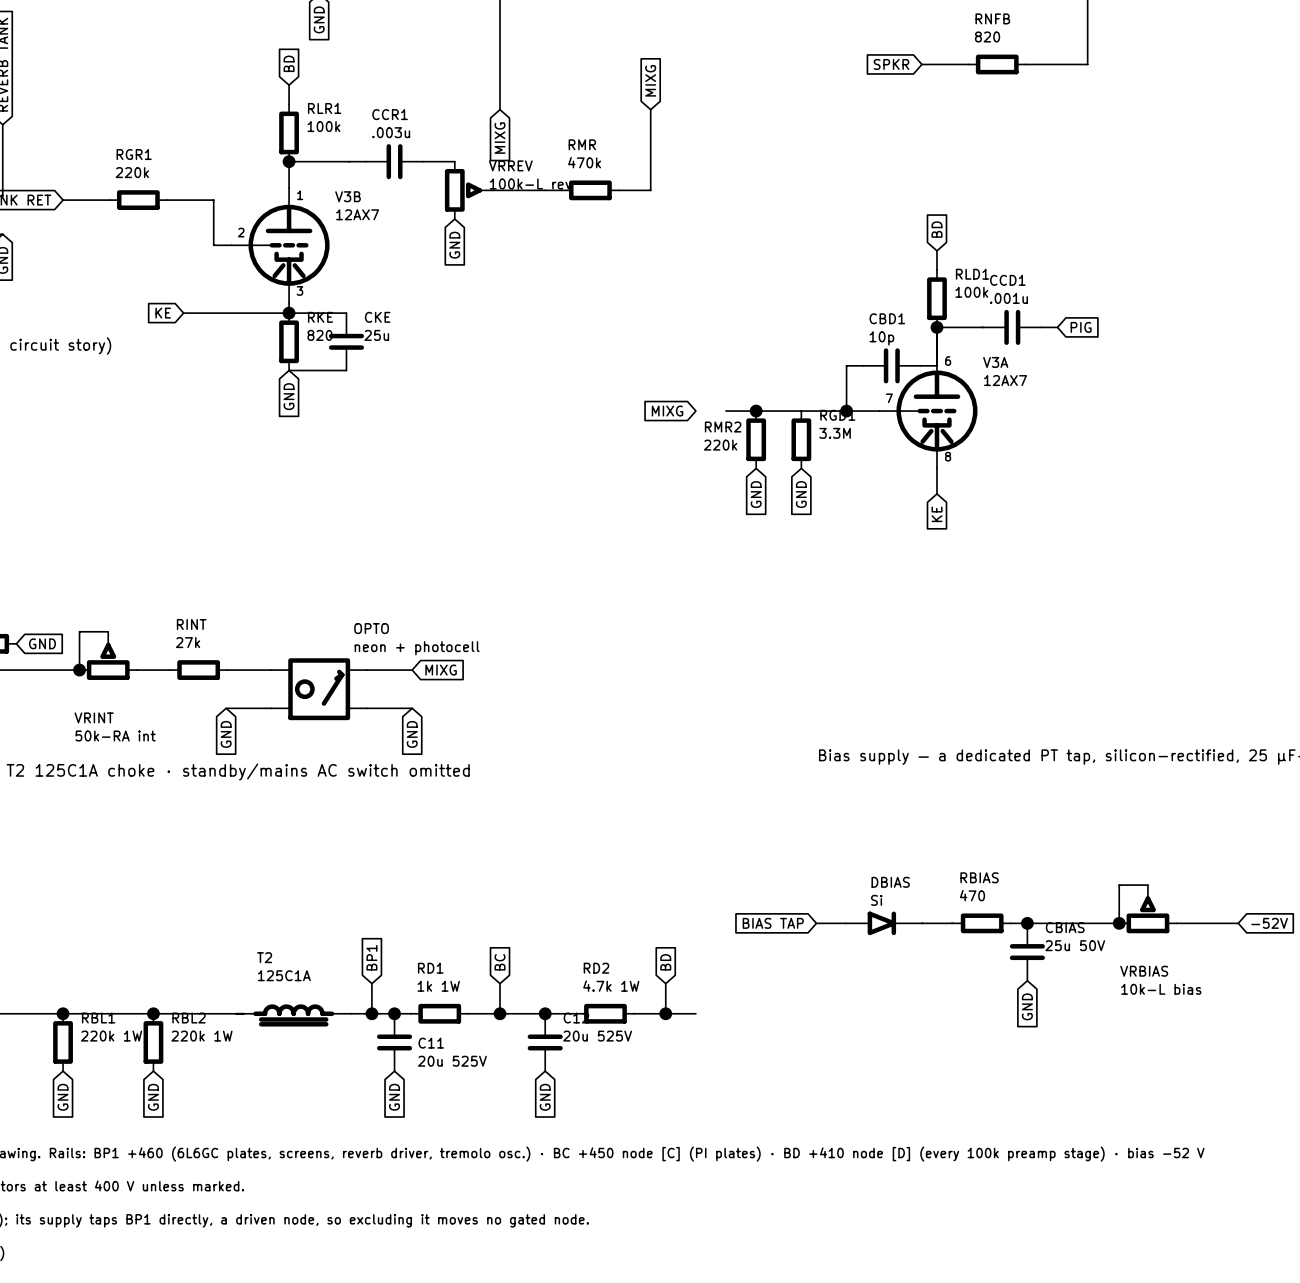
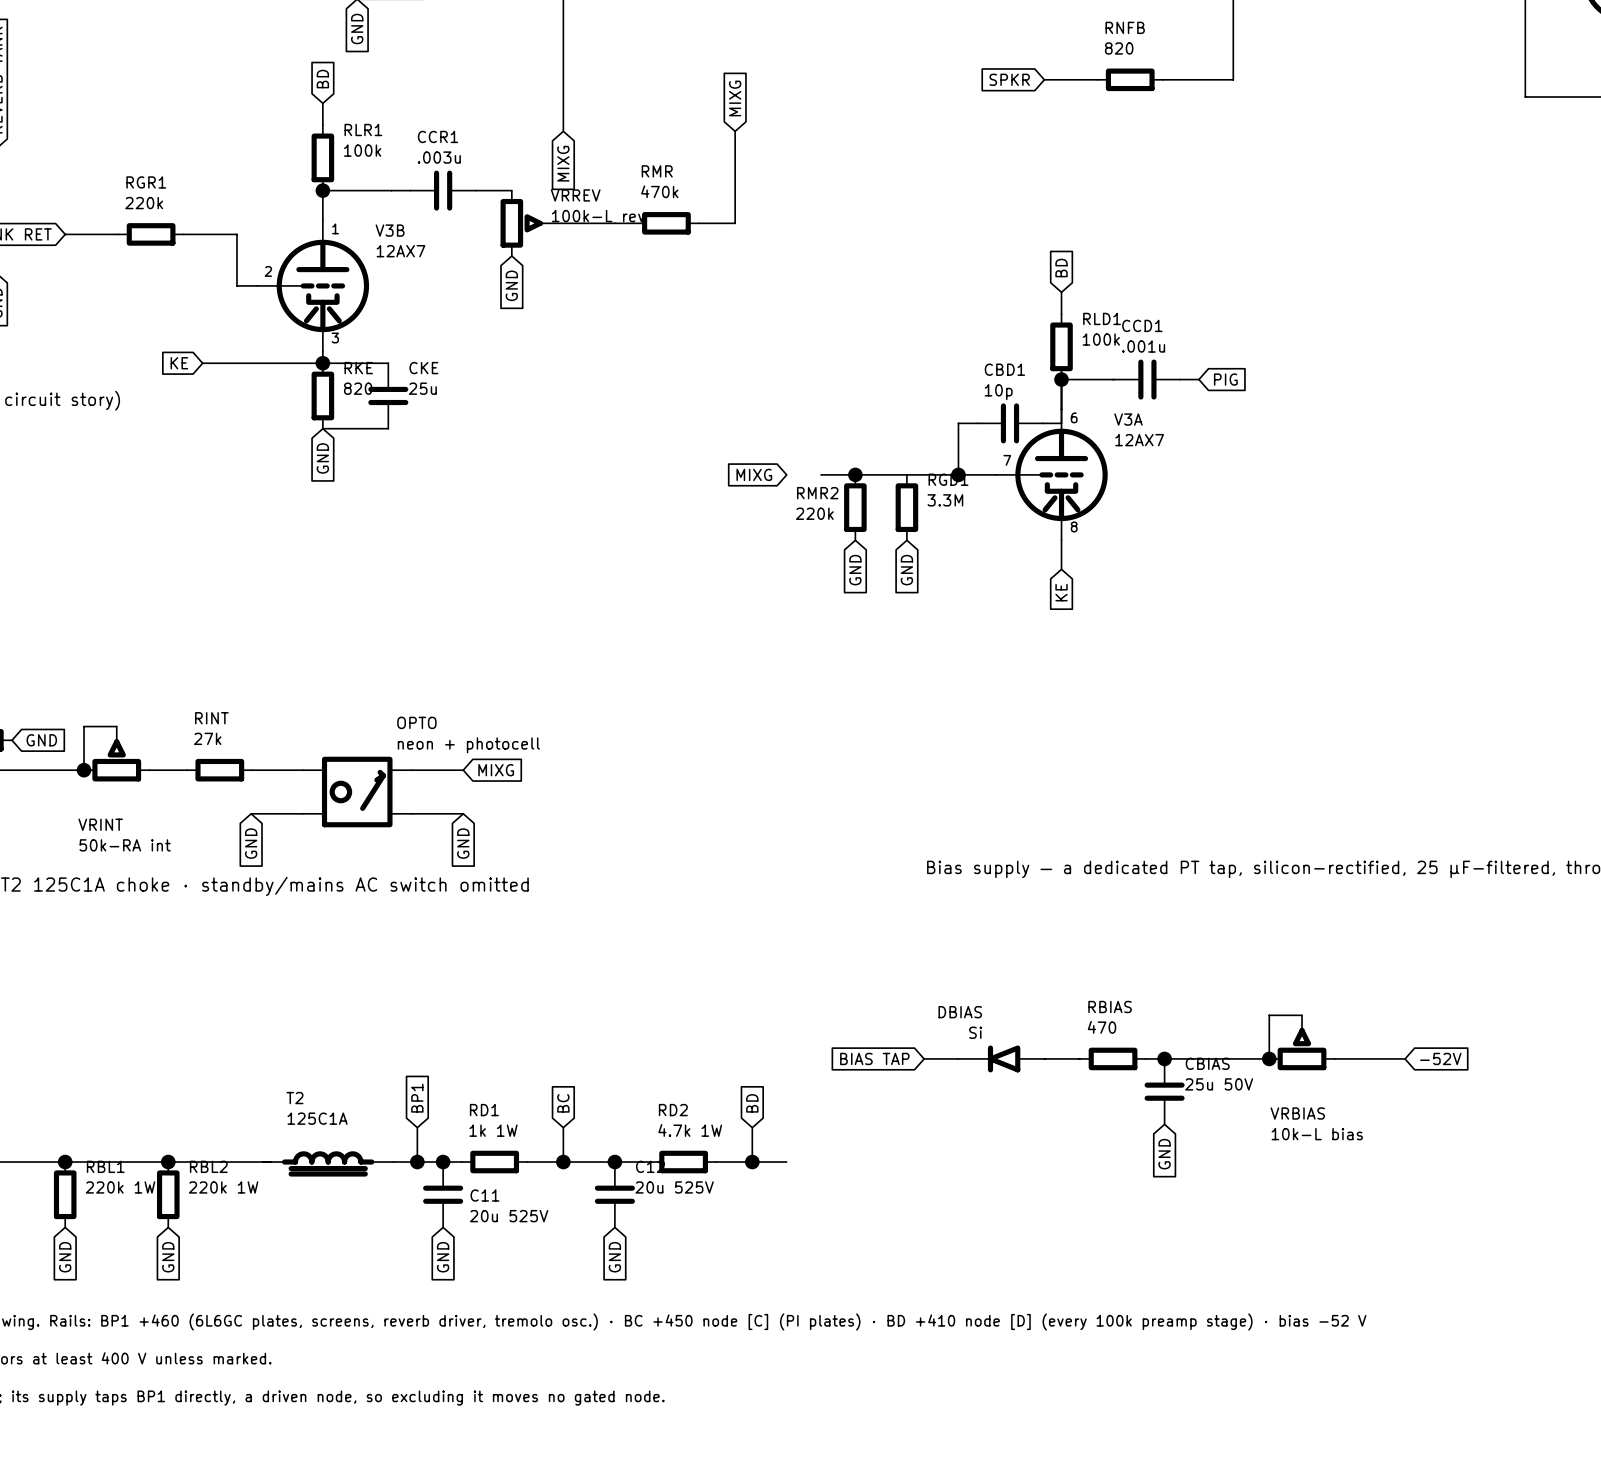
DBIAS name position: DBIAS (890, 882) -> DBIAS (960, 1012)
DBIAS value position: Si (876, 900) -> Si (975, 1032)
DBIAS rotation: 0° (881, 923) -> 180° (1004, 1058)

